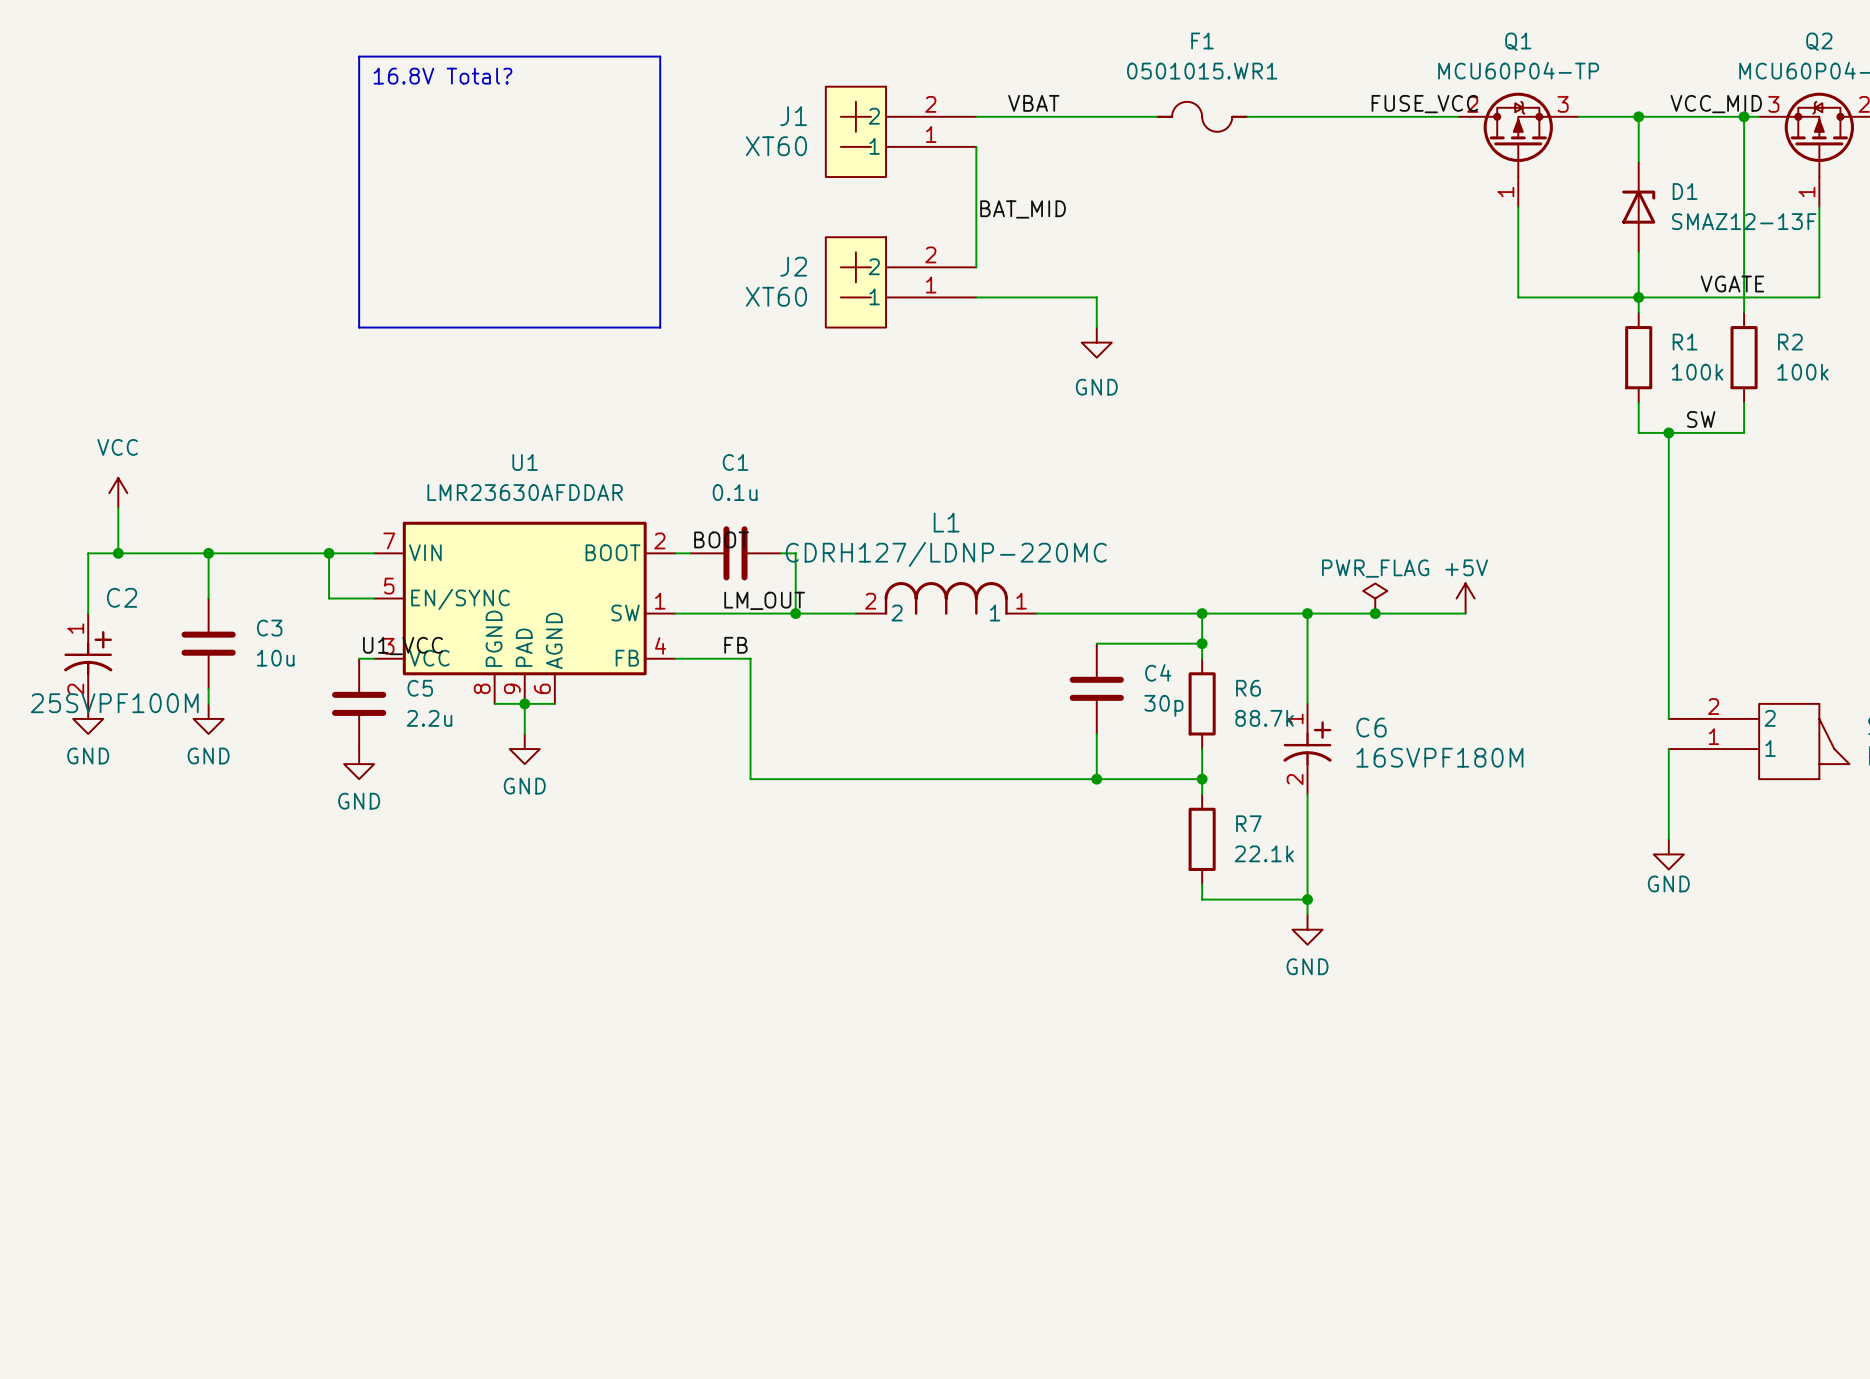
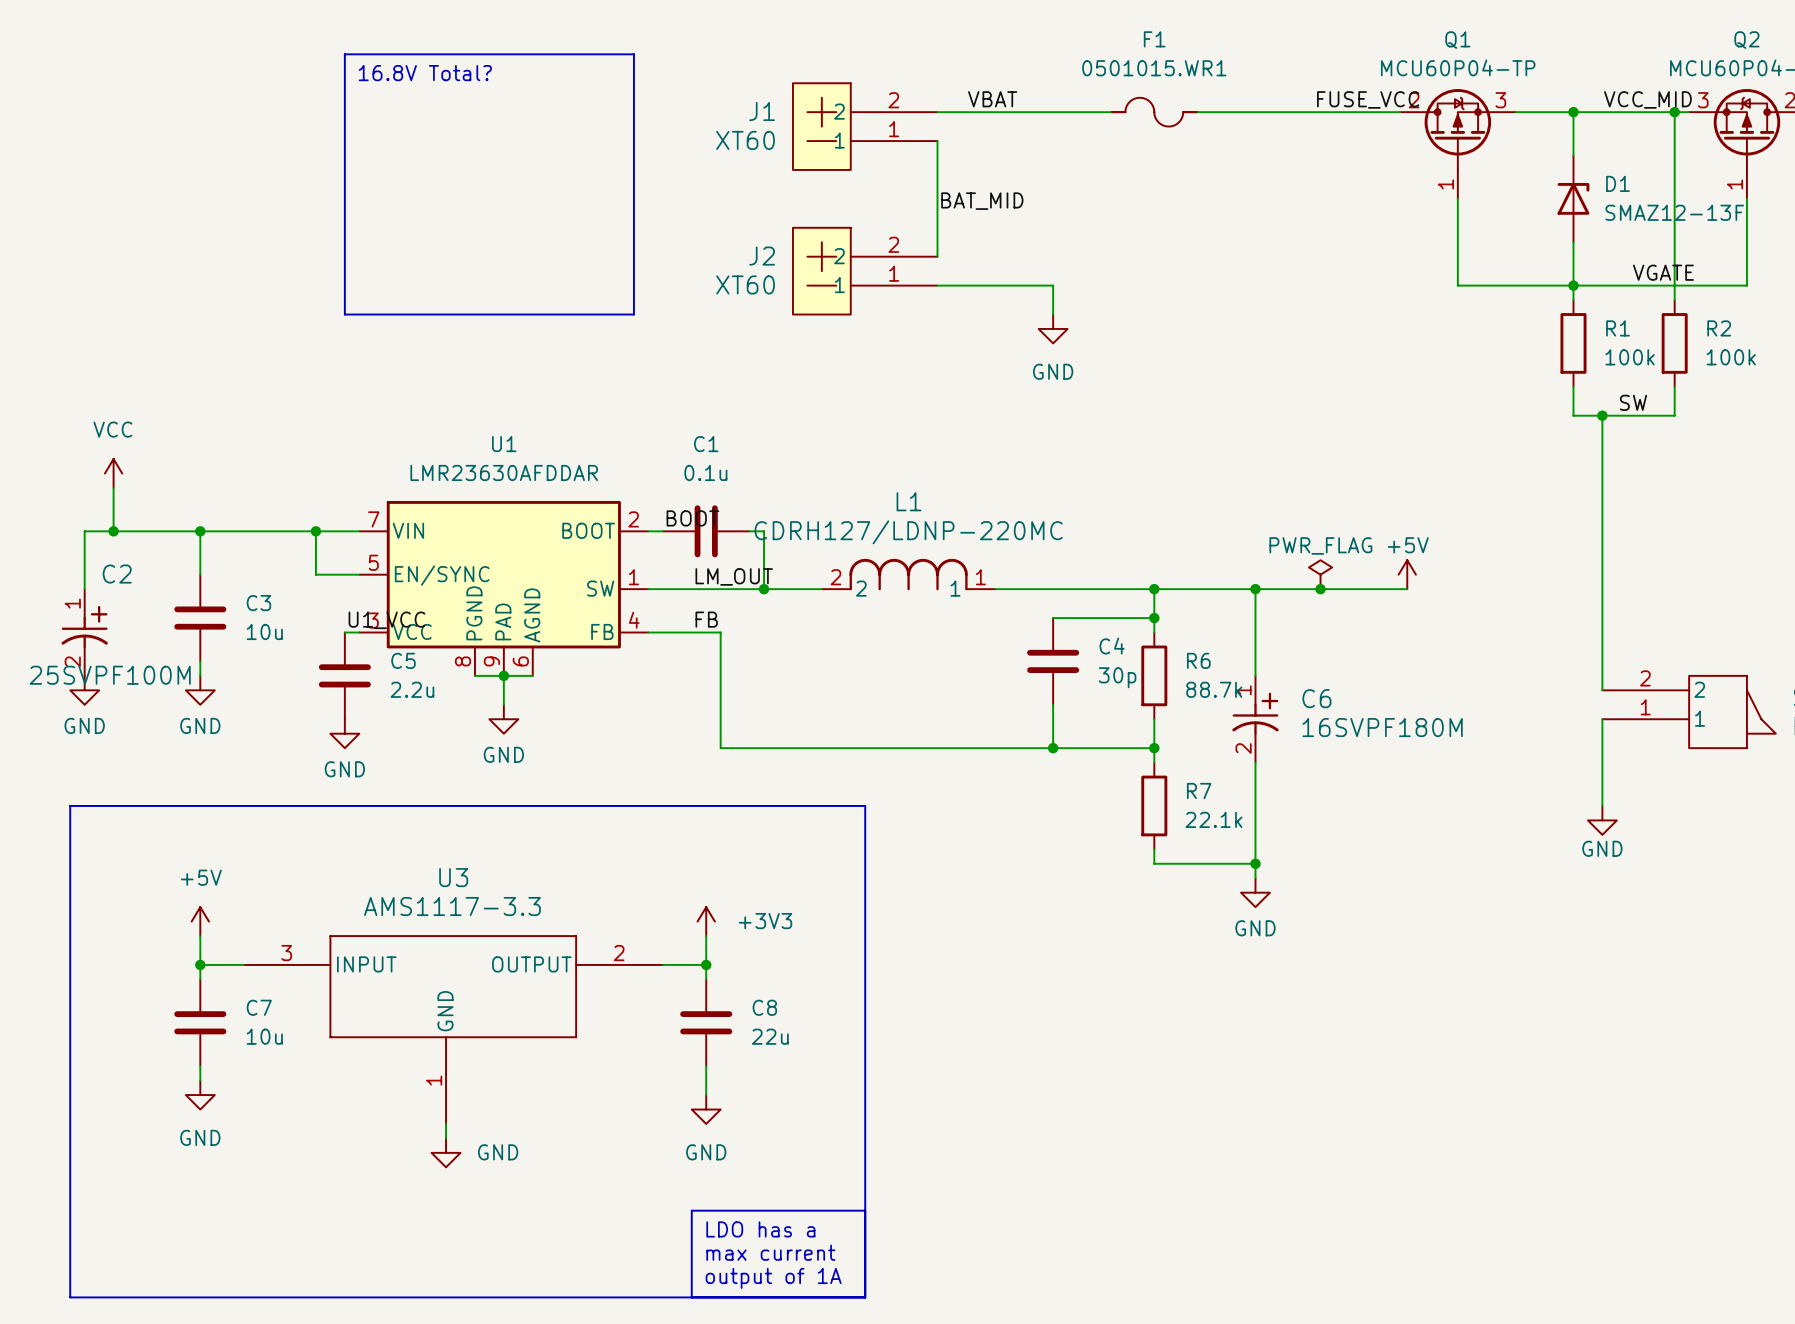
line: none -> (70, 805) (865, 805) (865, 1297) (70, 1297) (70, 805)
power symbol: none -> +5V (200, 921)
power symbol: none -> +3V3 (706, 921)
wire: none -> (200, 936) (200, 979)
wire: none -> (706, 936) (706, 979)
wire: none -> (200, 964) (243, 964)
junction: none -> (200, 964)
wire: none -> (662, 964) (706, 964)
junction: none -> (706, 964)
C7: none -> 10u (200, 1022)
C8: none -> 22u (706, 1022)
U3: none -> AMS1117-3.3 (453, 1029)
wire: none -> (200, 1066) (200, 1080)
wire: none -> (706, 1066) (706, 1095)
power symbol: none -> GND (200, 1095)
power symbol: none -> GND (706, 1109)
wire: none -> (446, 1123) (446, 1138)
power symbol: none -> GND (446, 1152)
line: none -> (865, 1210) (691, 1210) (691, 1297)
text: none -> LDO has a (760, 1229)
text: none -> max current (770, 1252)
text: none -> output of 1A (773, 1278)

